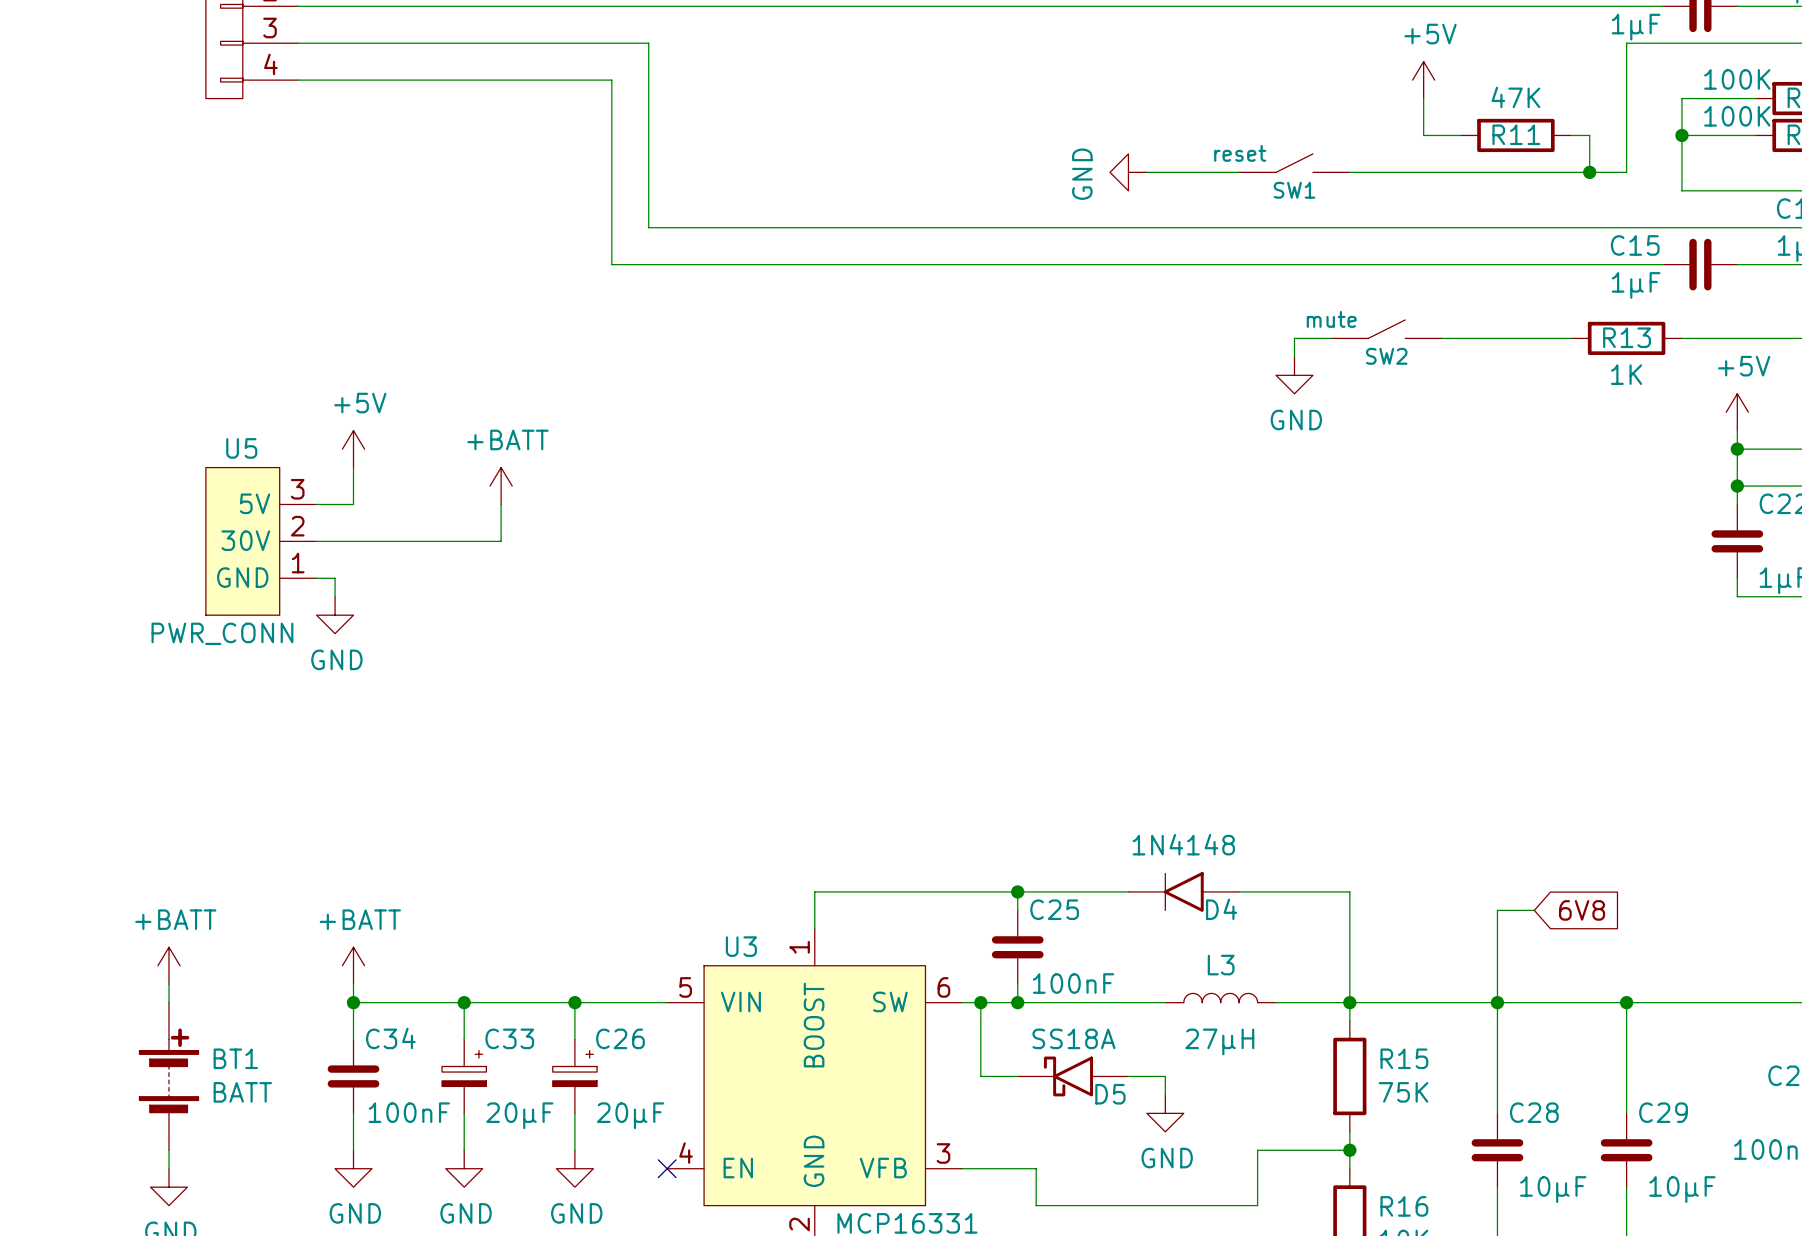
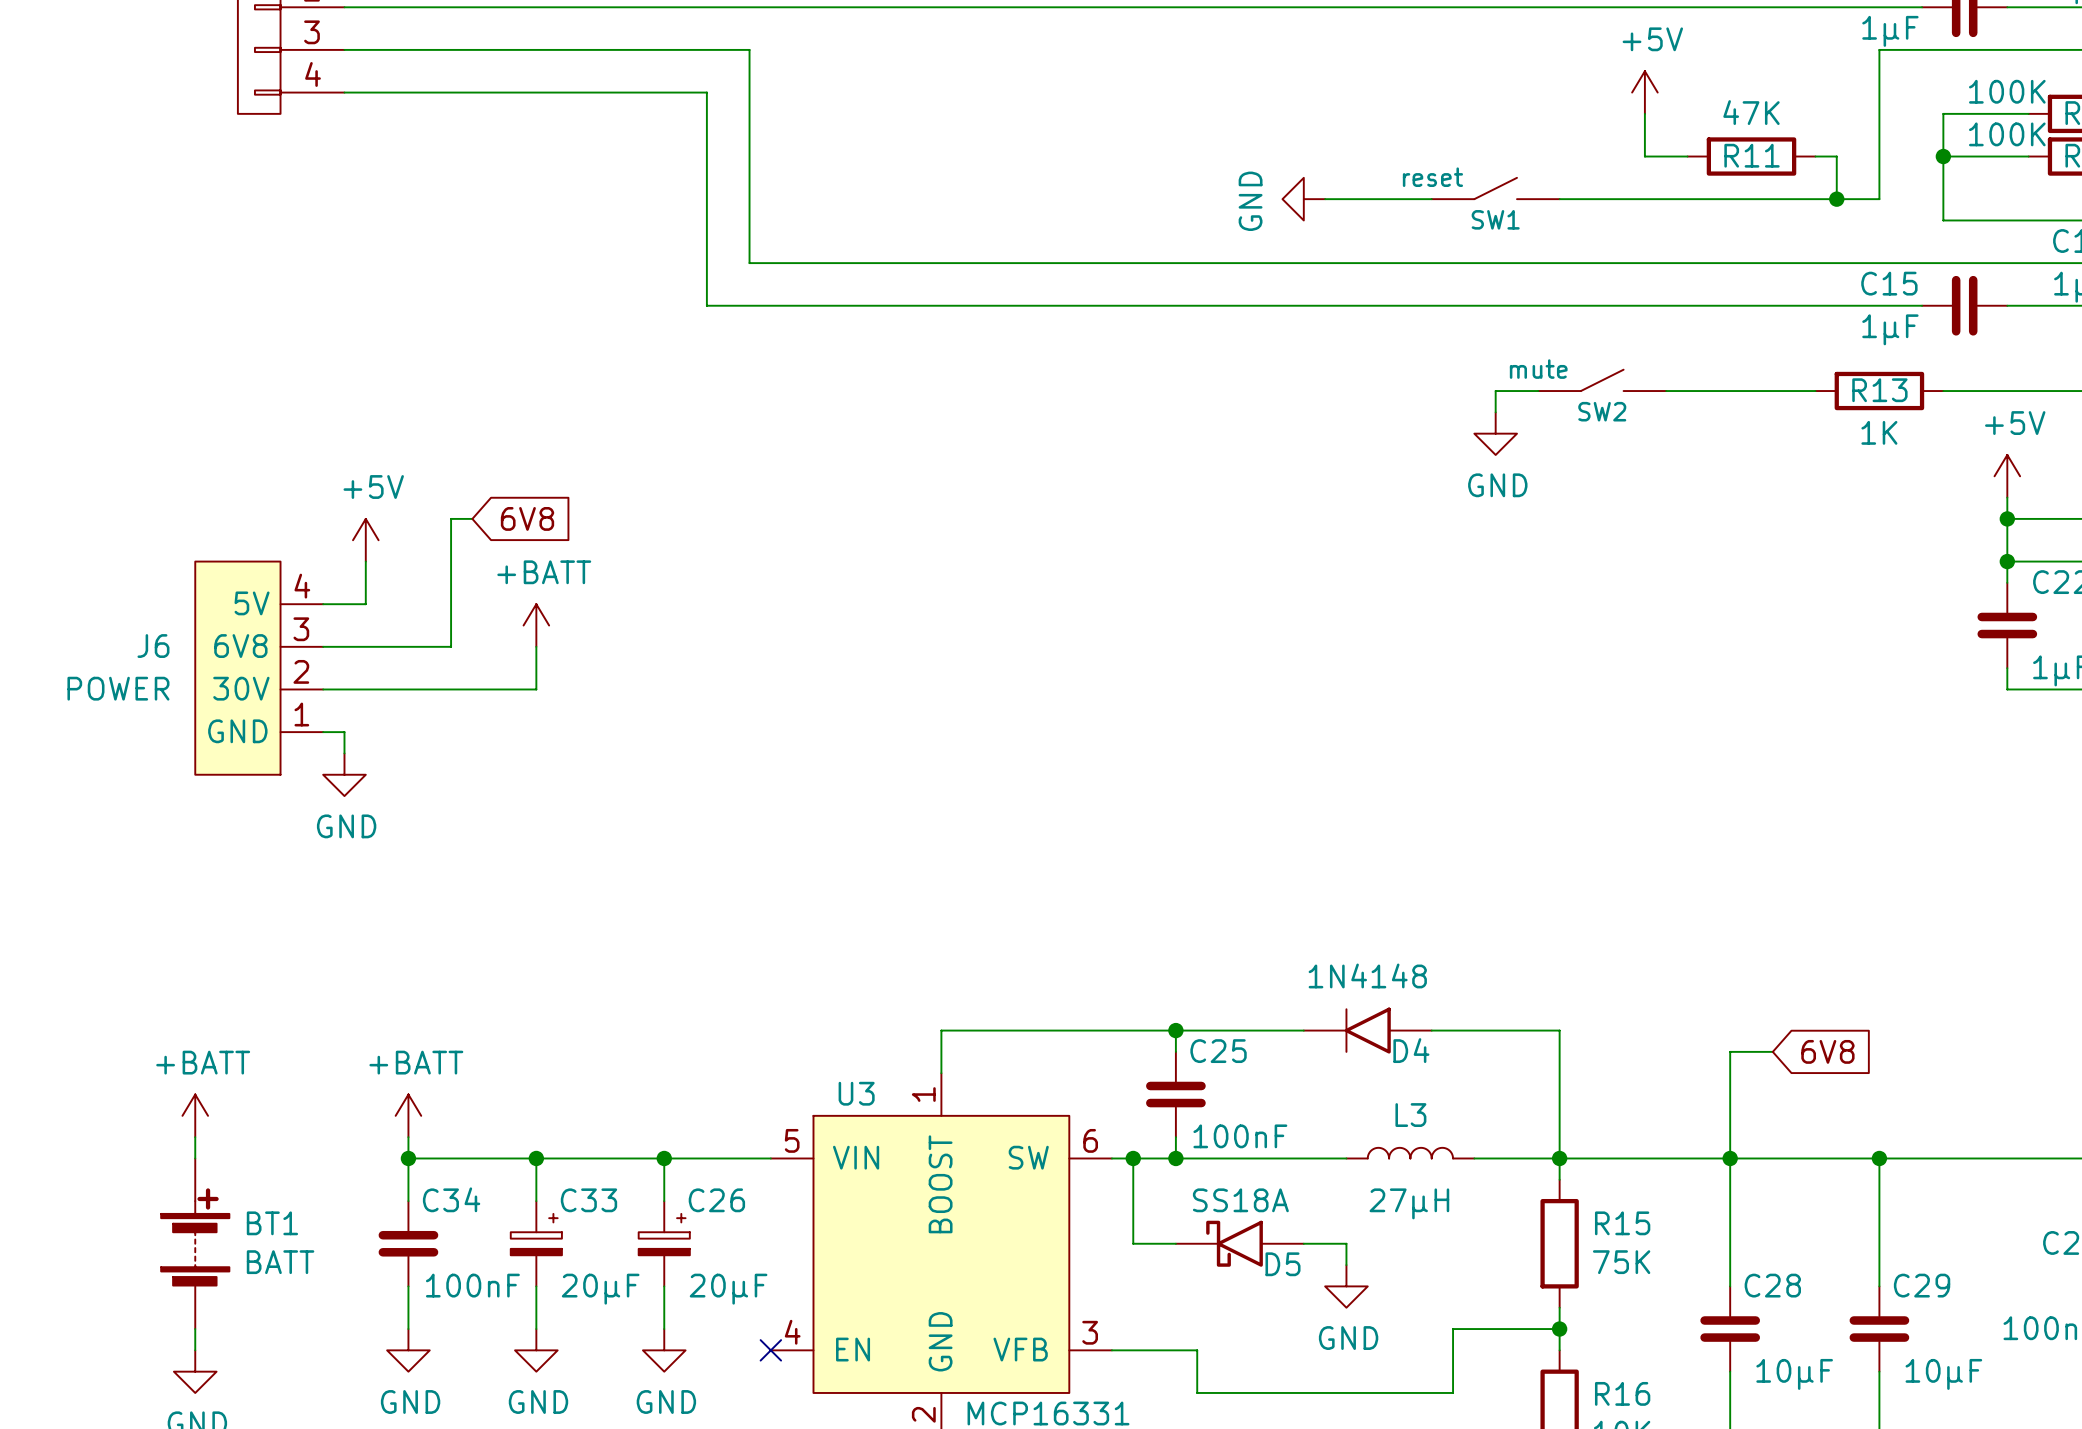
power symbol position: +5V (353, 449) -> +5V (365, 540)
wire: none -> (472, 518) (451, 518) (451, 646) (323, 646)
global label: none -> 6V8 (527, 518)
wire: (353, 467) (353, 504) (316, 504) -> (365, 561) (365, 604) (323, 604)
power symbol position: +BATT (501, 486) -> +BATT (536, 625)
wire: (501, 504) (501, 541) (316, 541) -> (536, 646) (536, 689) (323, 689)
U5: PWR_CONN (261, 541) -> none
J6: none -> POWER (259, 668)
wire: (316, 578) (335, 578) (335, 596) -> (323, 732) (344, 732) (344, 753)
power symbol position: GND (335, 615) -> GND (344, 774)

